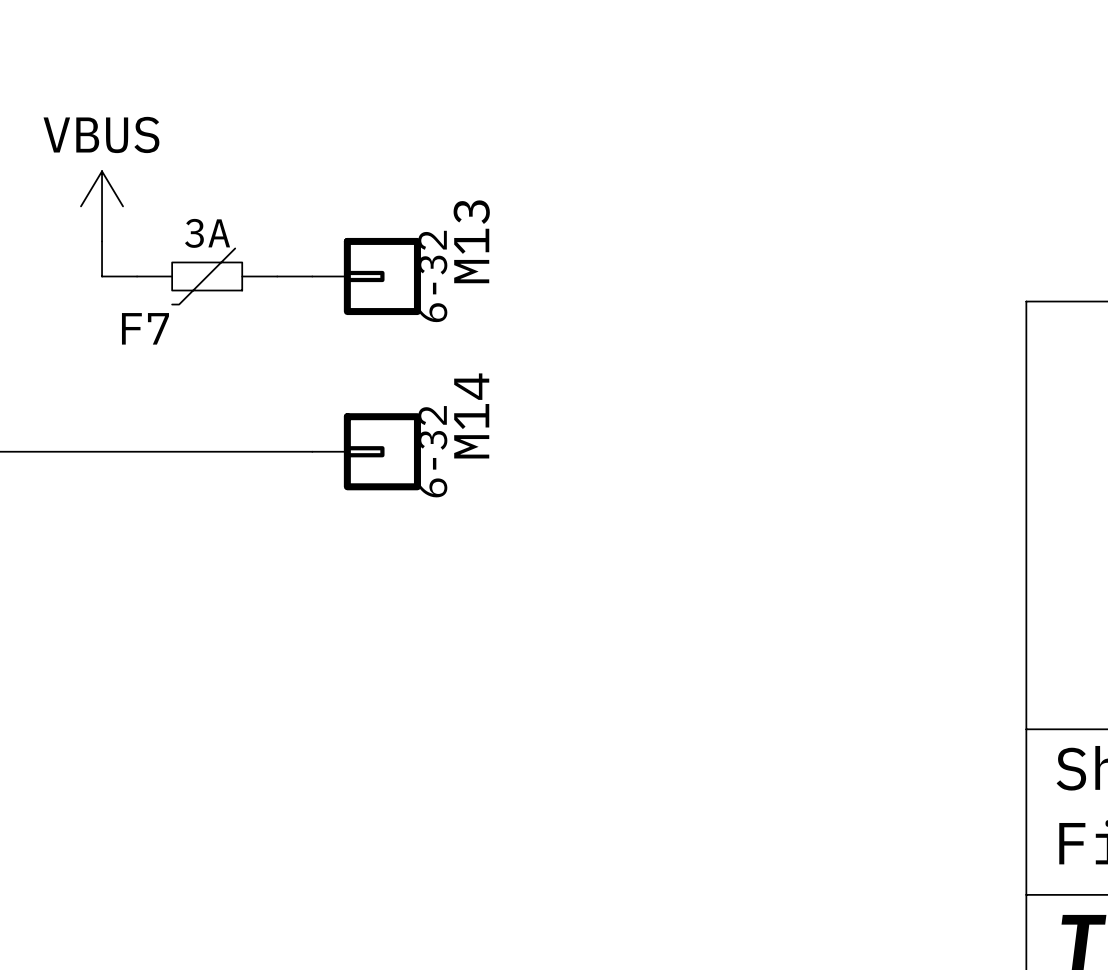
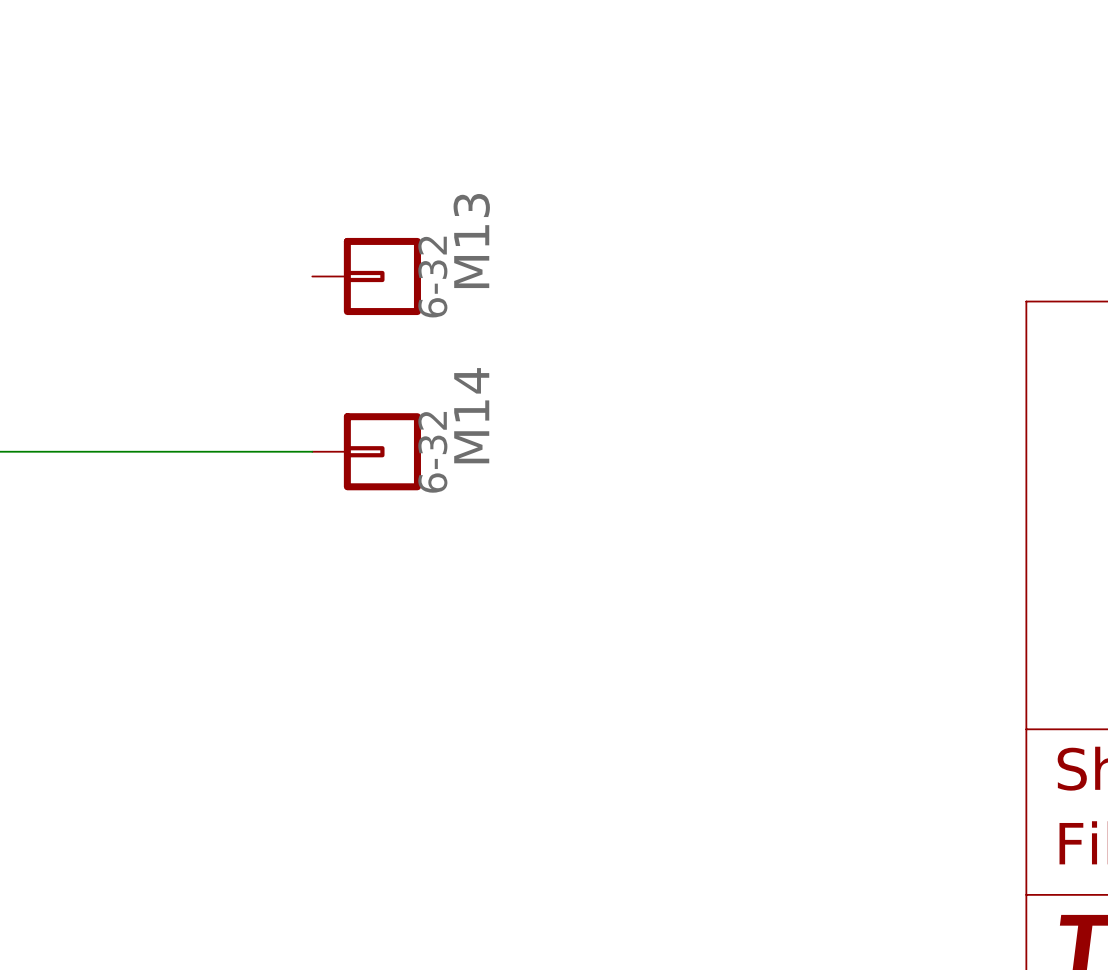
power symbol: VBUS (102, 206) -> none
wire: (102, 241) (102, 276) (137, 276) -> none
F7: (207, 276) -> none
wire: (277, 276) (312, 276) -> none

